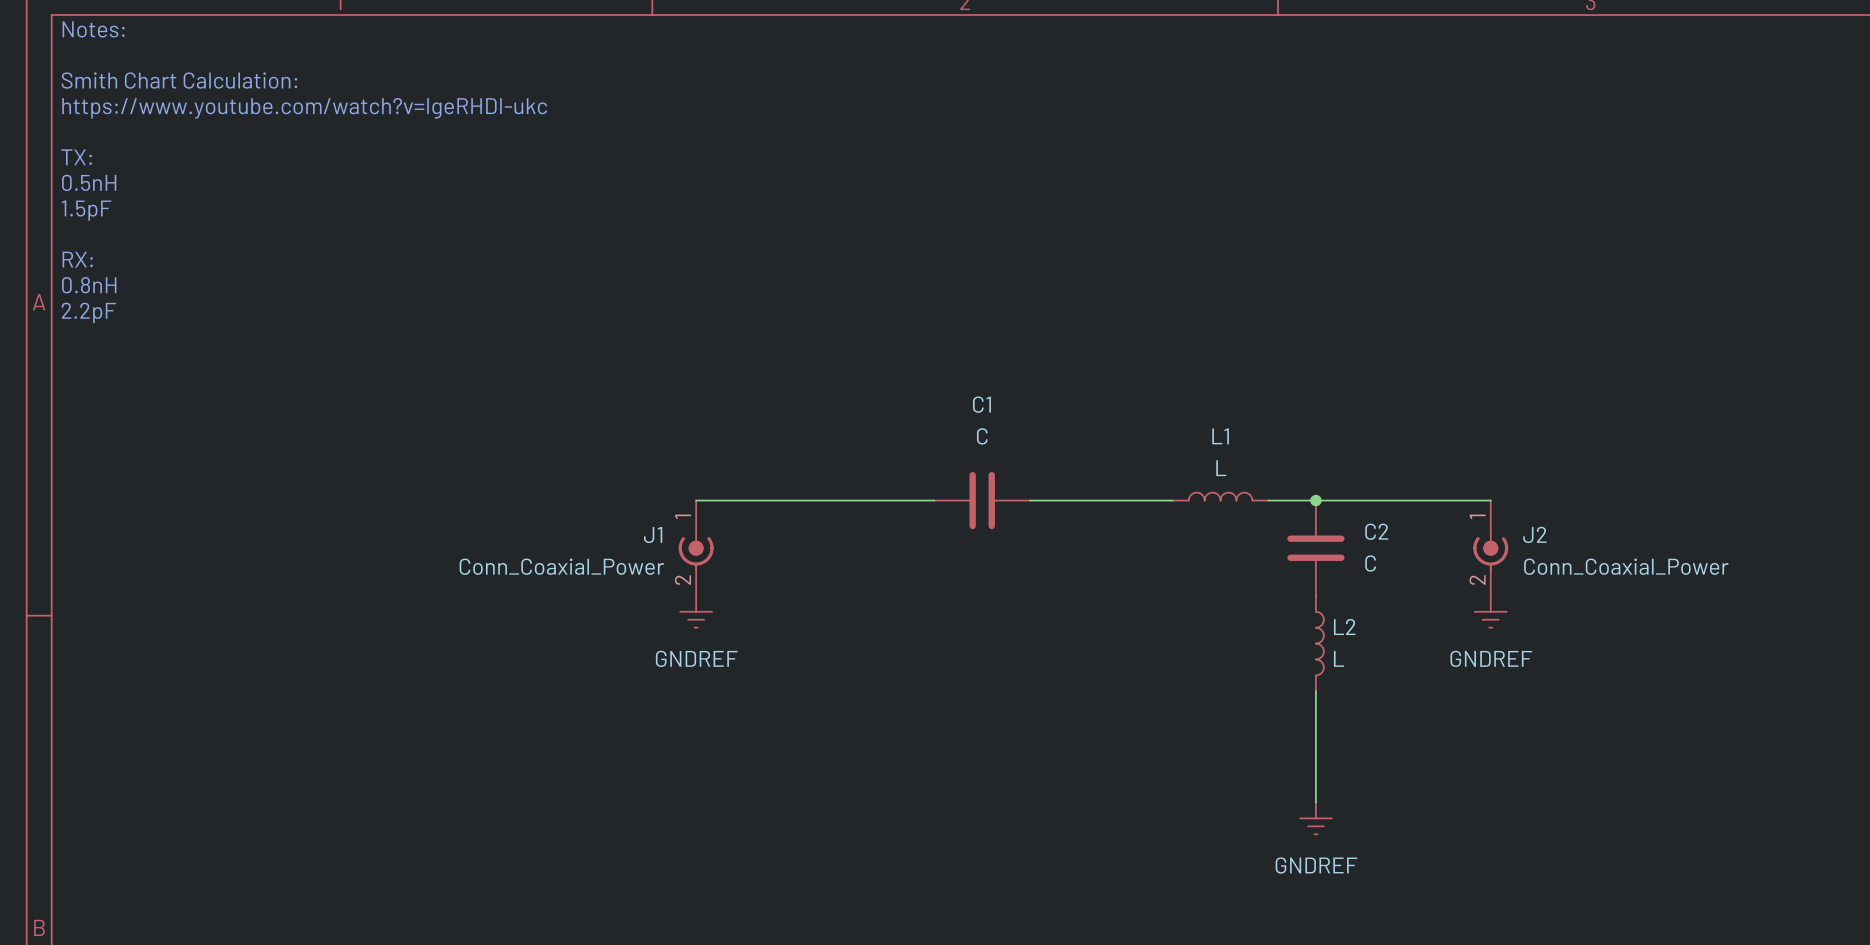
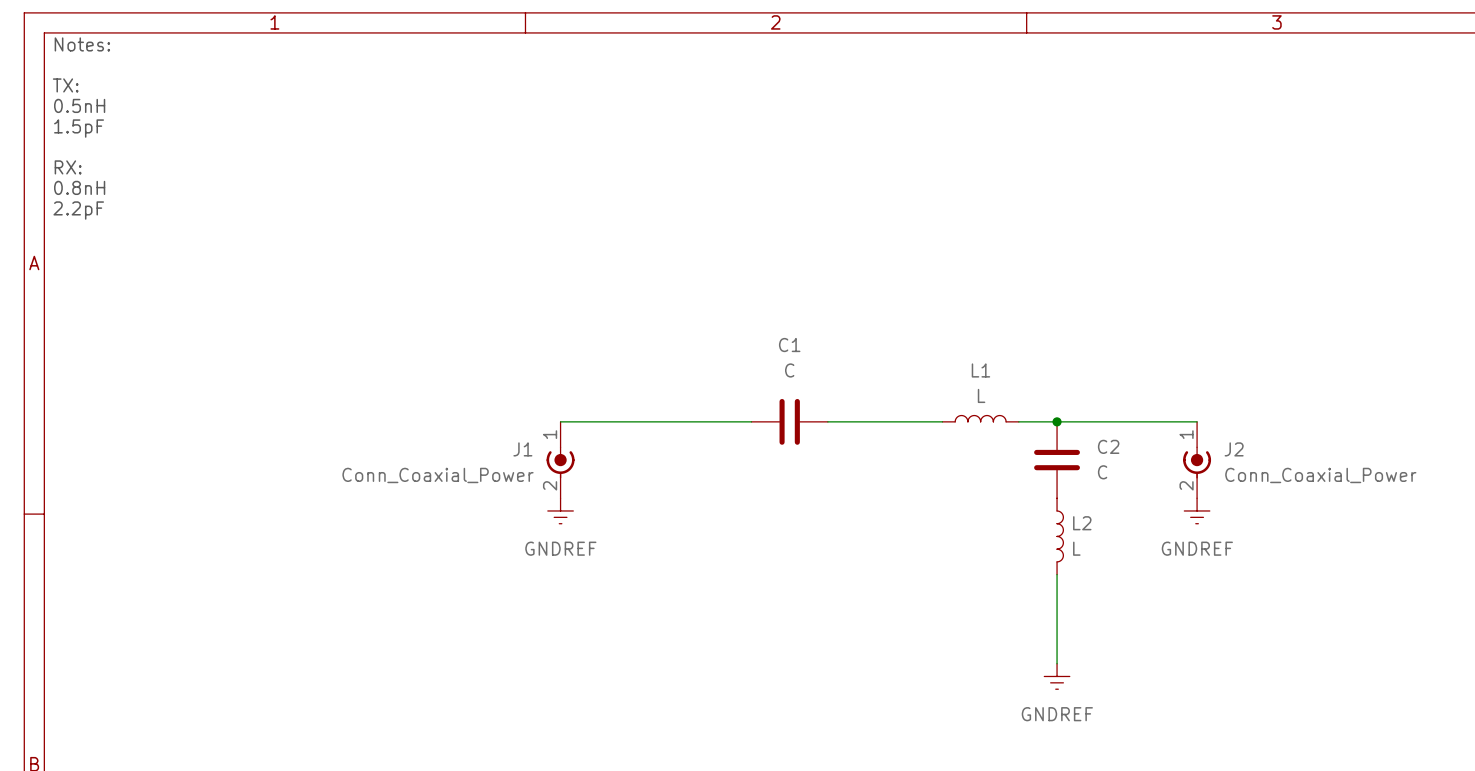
text: Smith Chart Calculation: (179, 80) -> TX: (65, 85)
text: https://www.youtube.com/watch?v=IgeRHDI-ukc (304, 108) -> 0.5nH (79, 105)
text: none -> 1.5pF (79, 128)
text: TX: (76, 157) -> none
text: 0.5nH (89, 182) -> RX: (68, 167)
text: 1.5pF (86, 210) -> 0.8nH (79, 187)
text: RX: (77, 259) -> none
text: 0.8nH (89, 285) -> none
text position: 2.2pF (88, 312) -> 2.2pF (78, 210)

